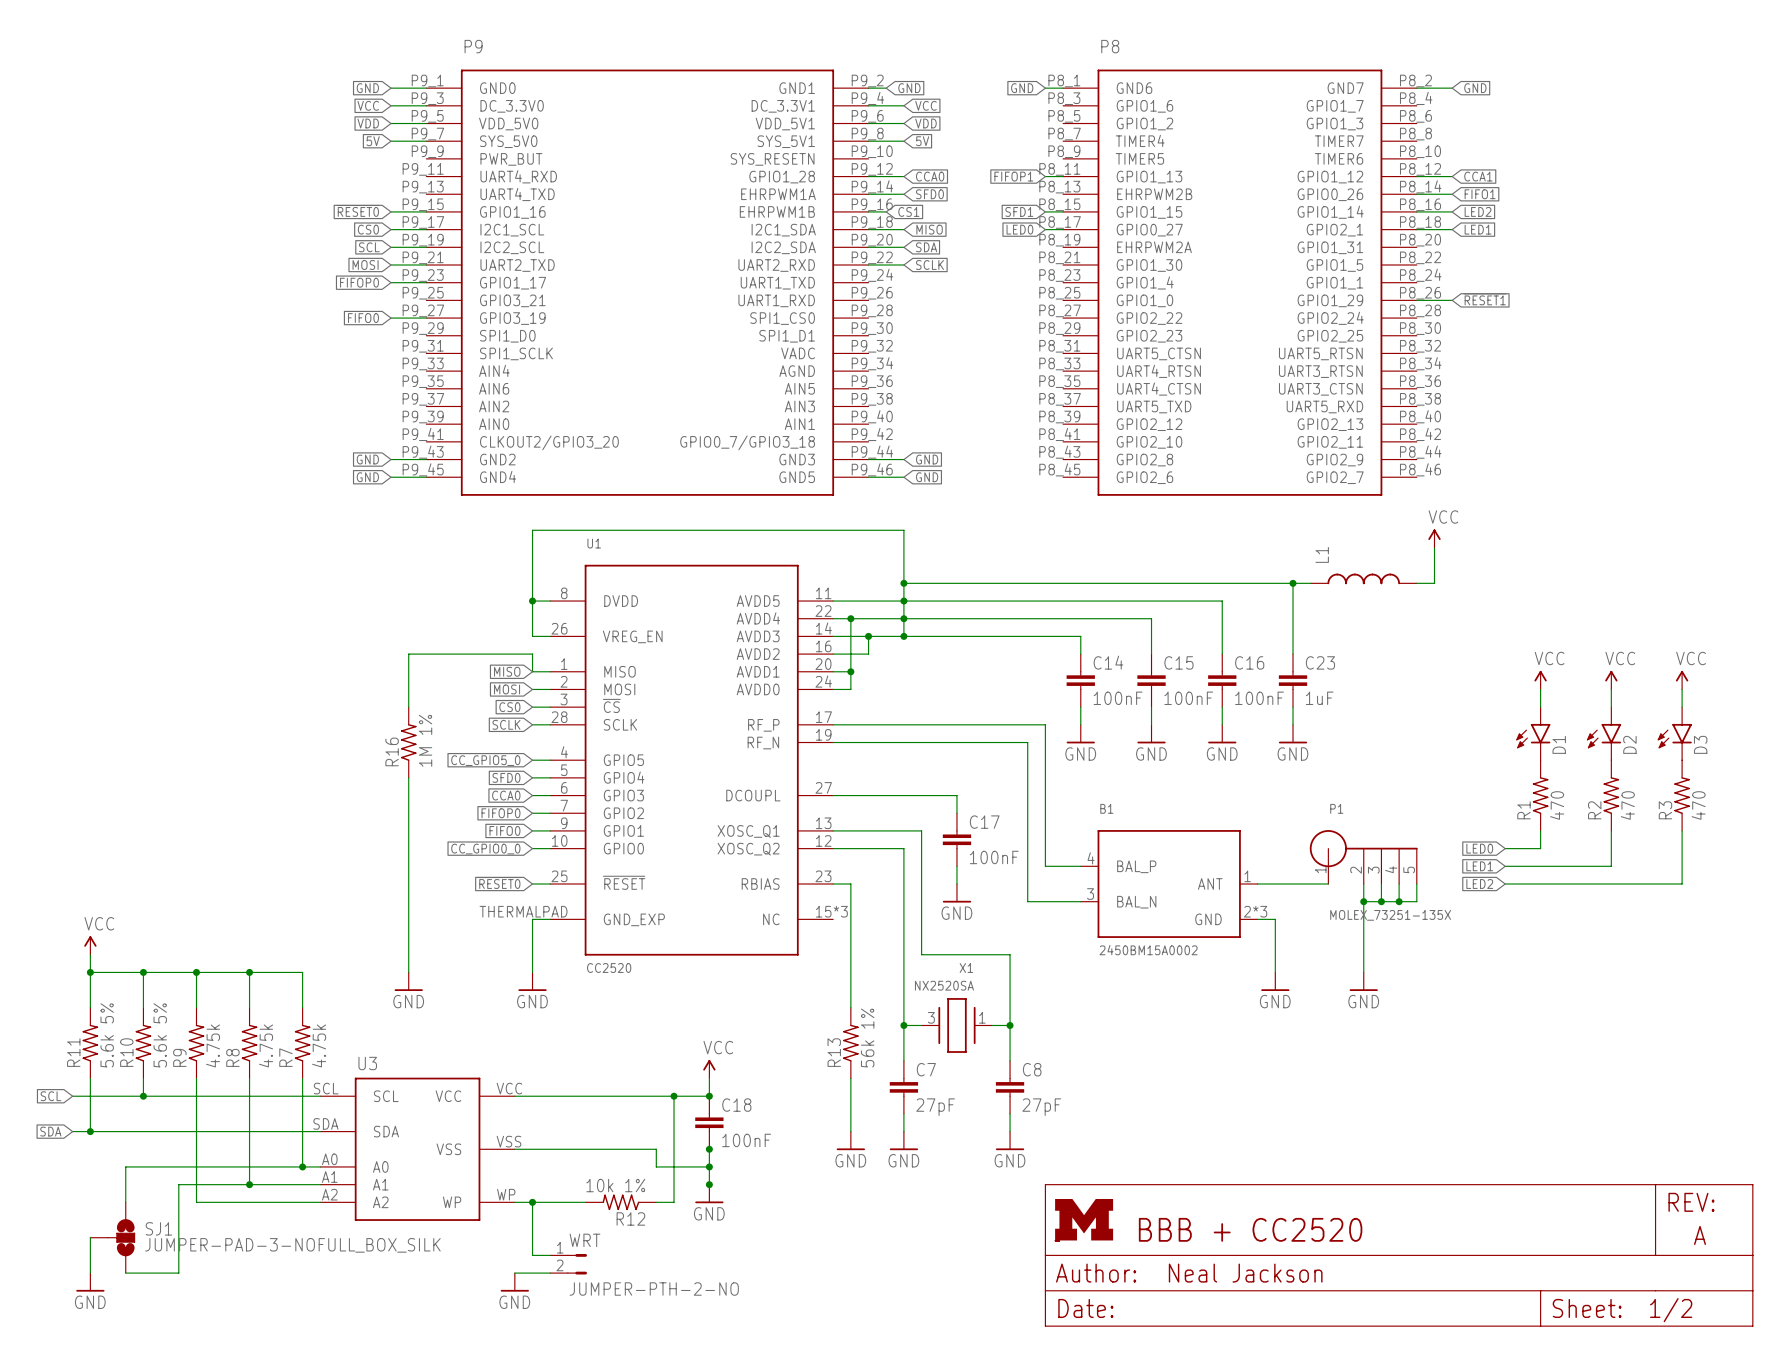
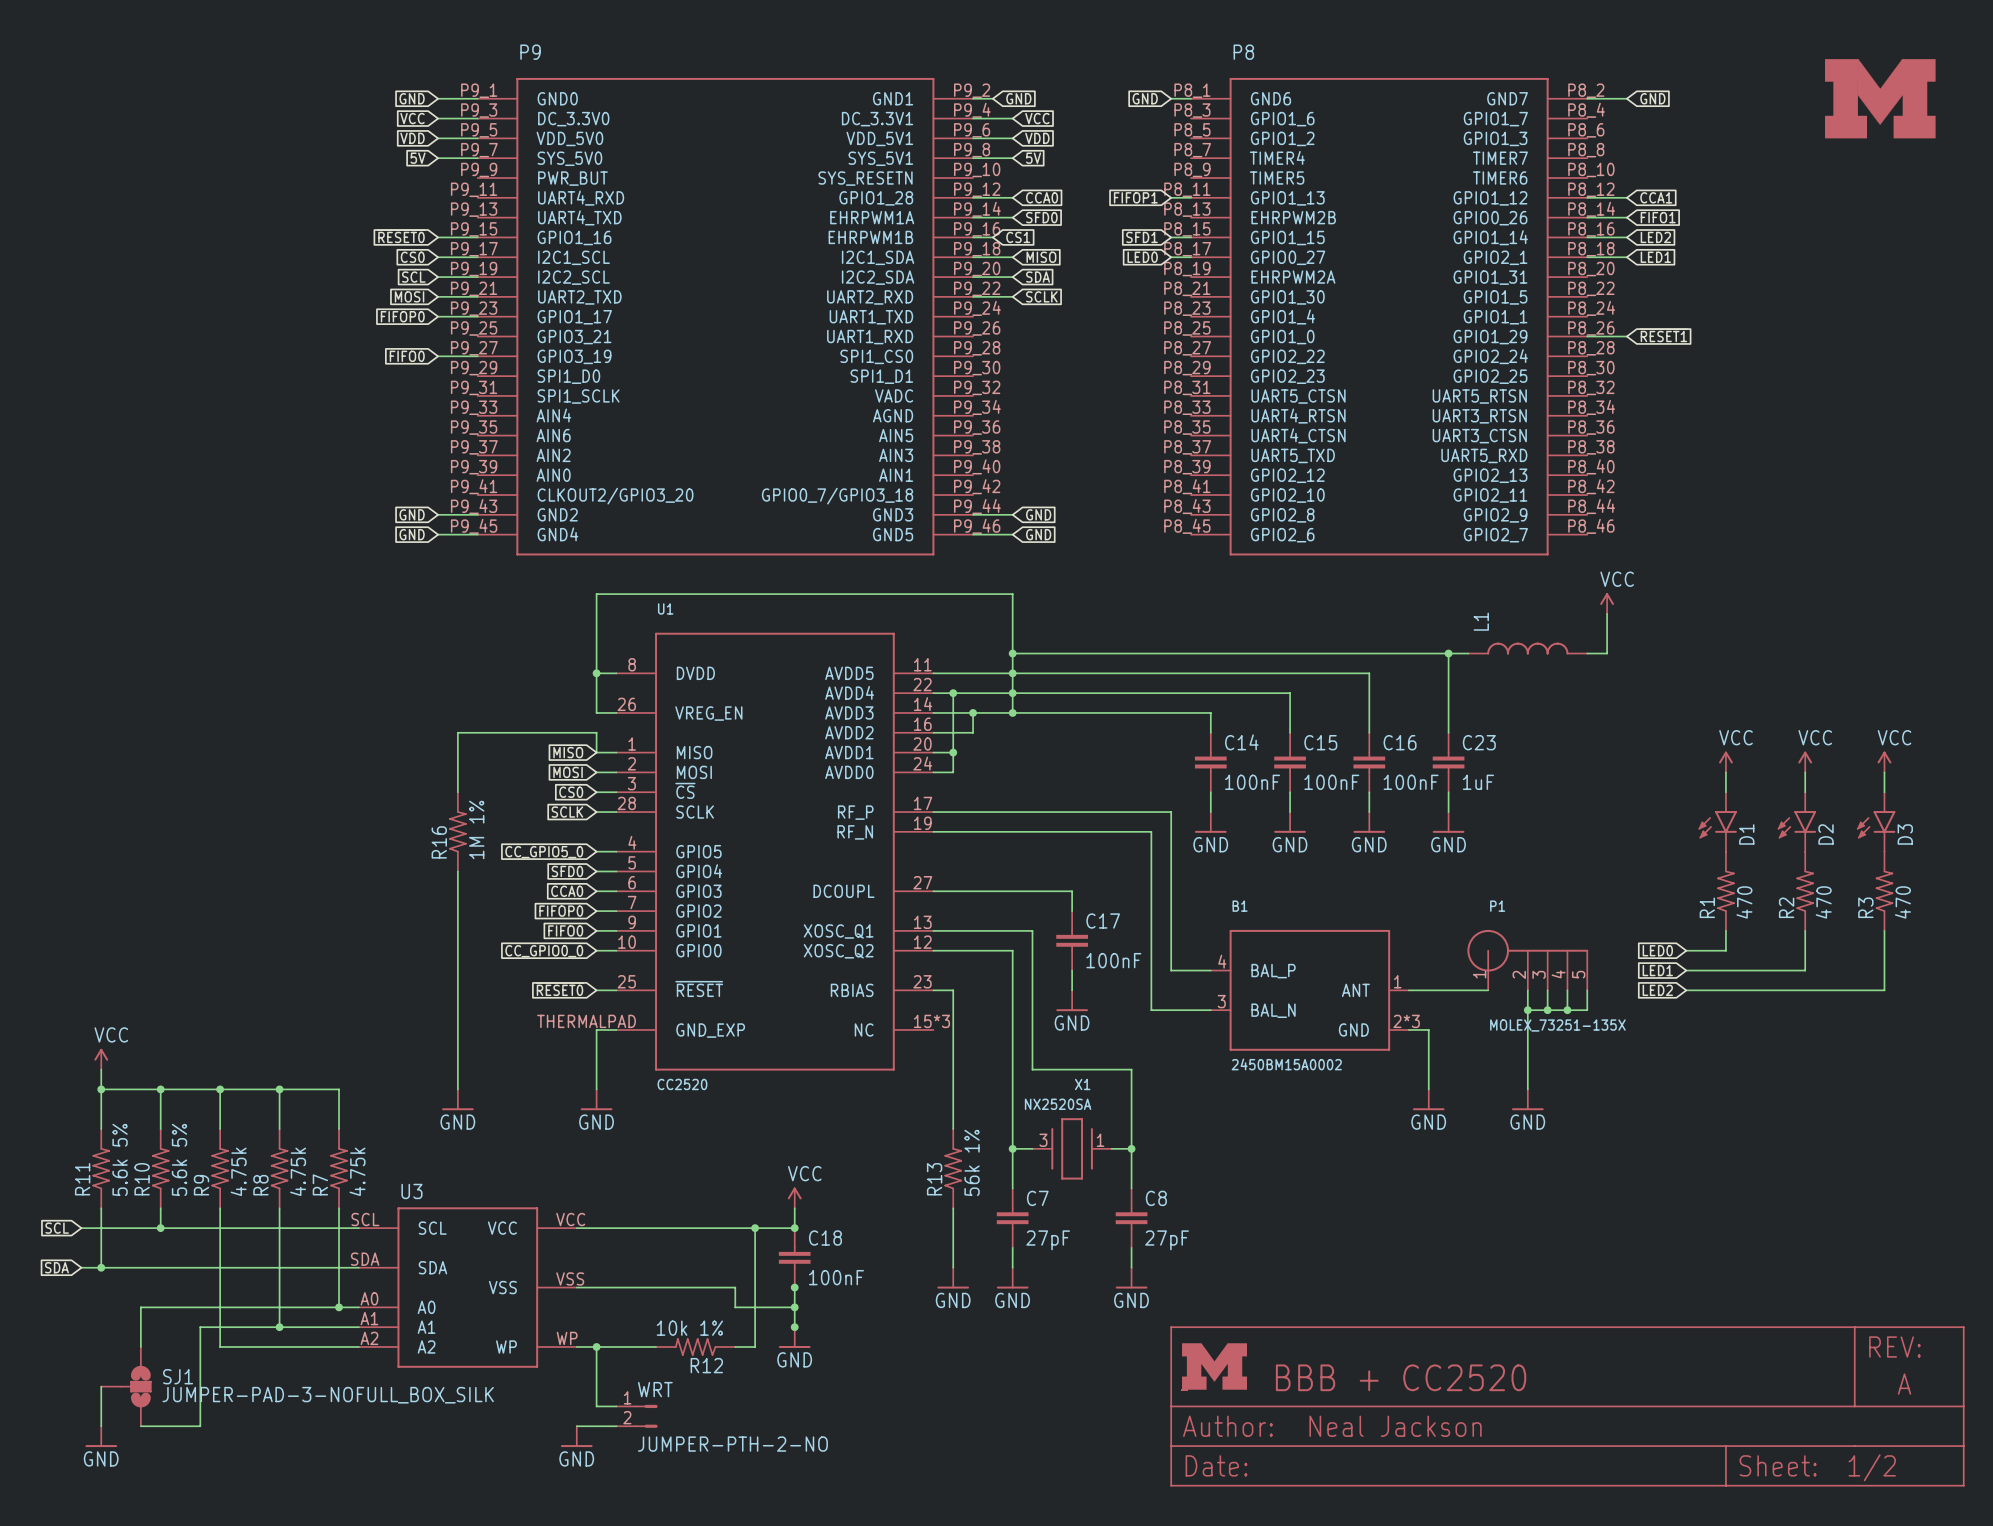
part: none -> (1880, 98)

